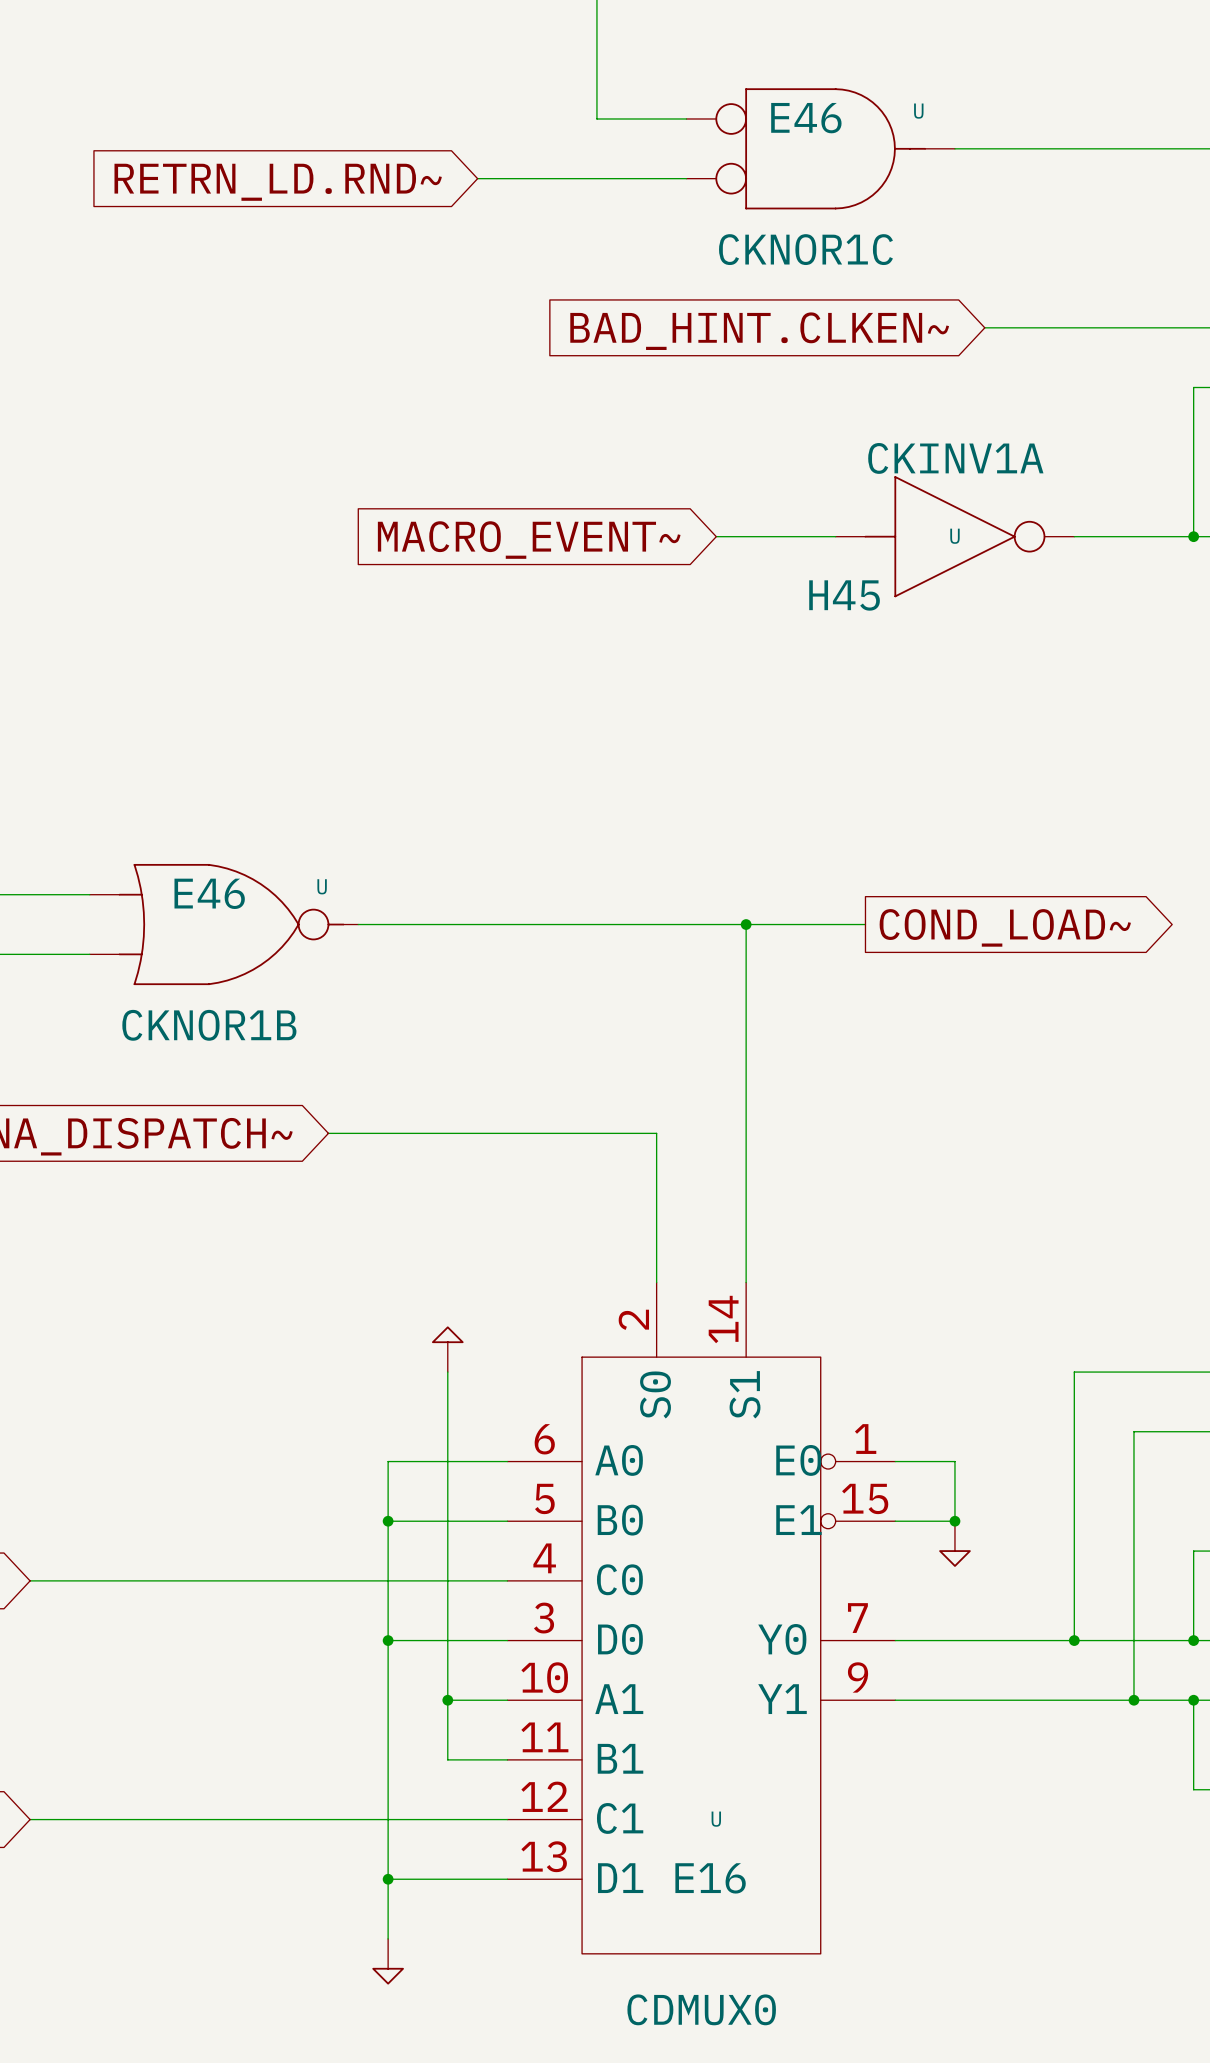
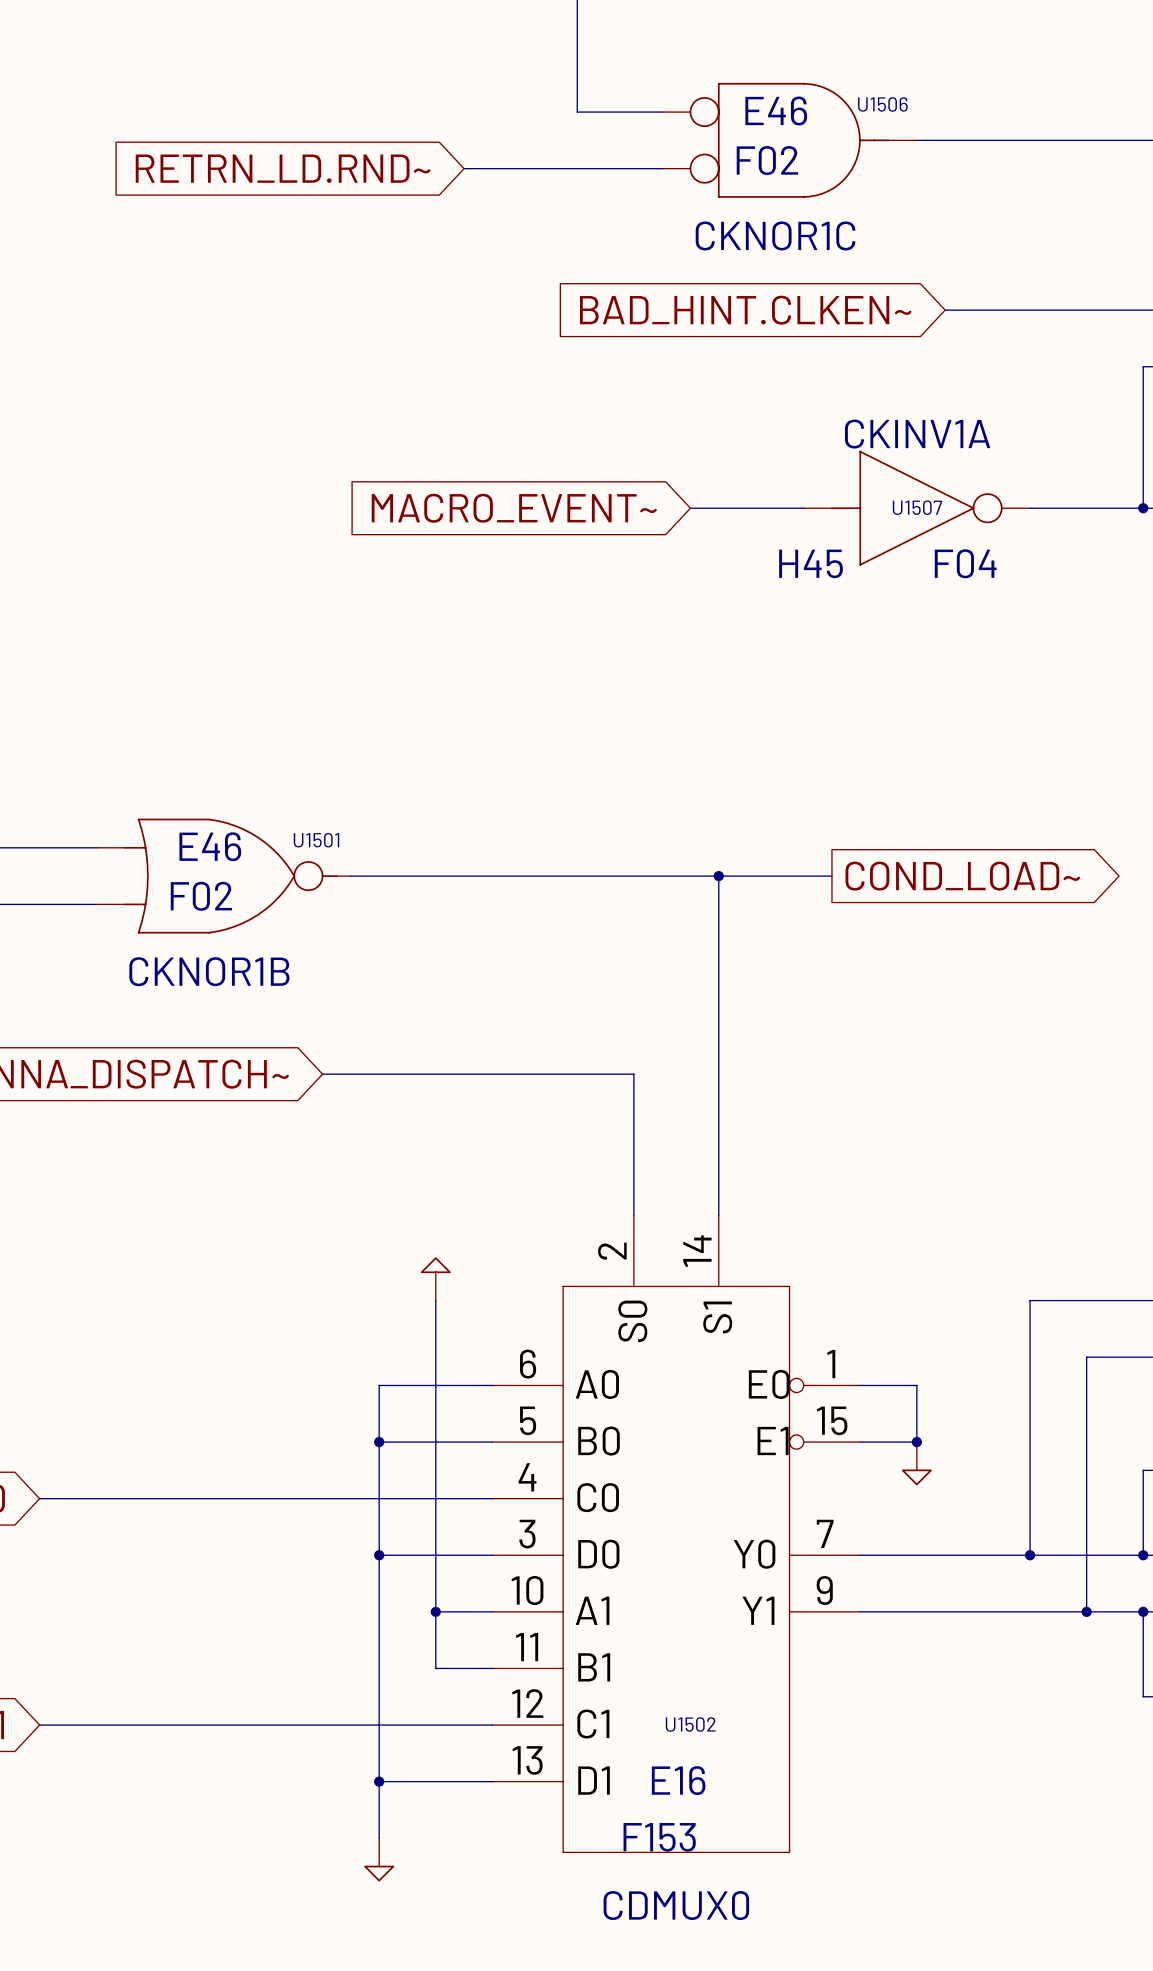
U name: U (918, 111) -> U1506 (882, 104)
U value: none -> F02 (767, 160)
U name: U (954, 536) -> U1507 (917, 507)
U value: none -> F04 (965, 563)
U name: U (322, 886) -> U1501 (316, 840)
U value: none -> F02 (201, 896)
U name: U (716, 1819) -> U1502 (690, 1724)
U value: none -> F153 (659, 1837)

